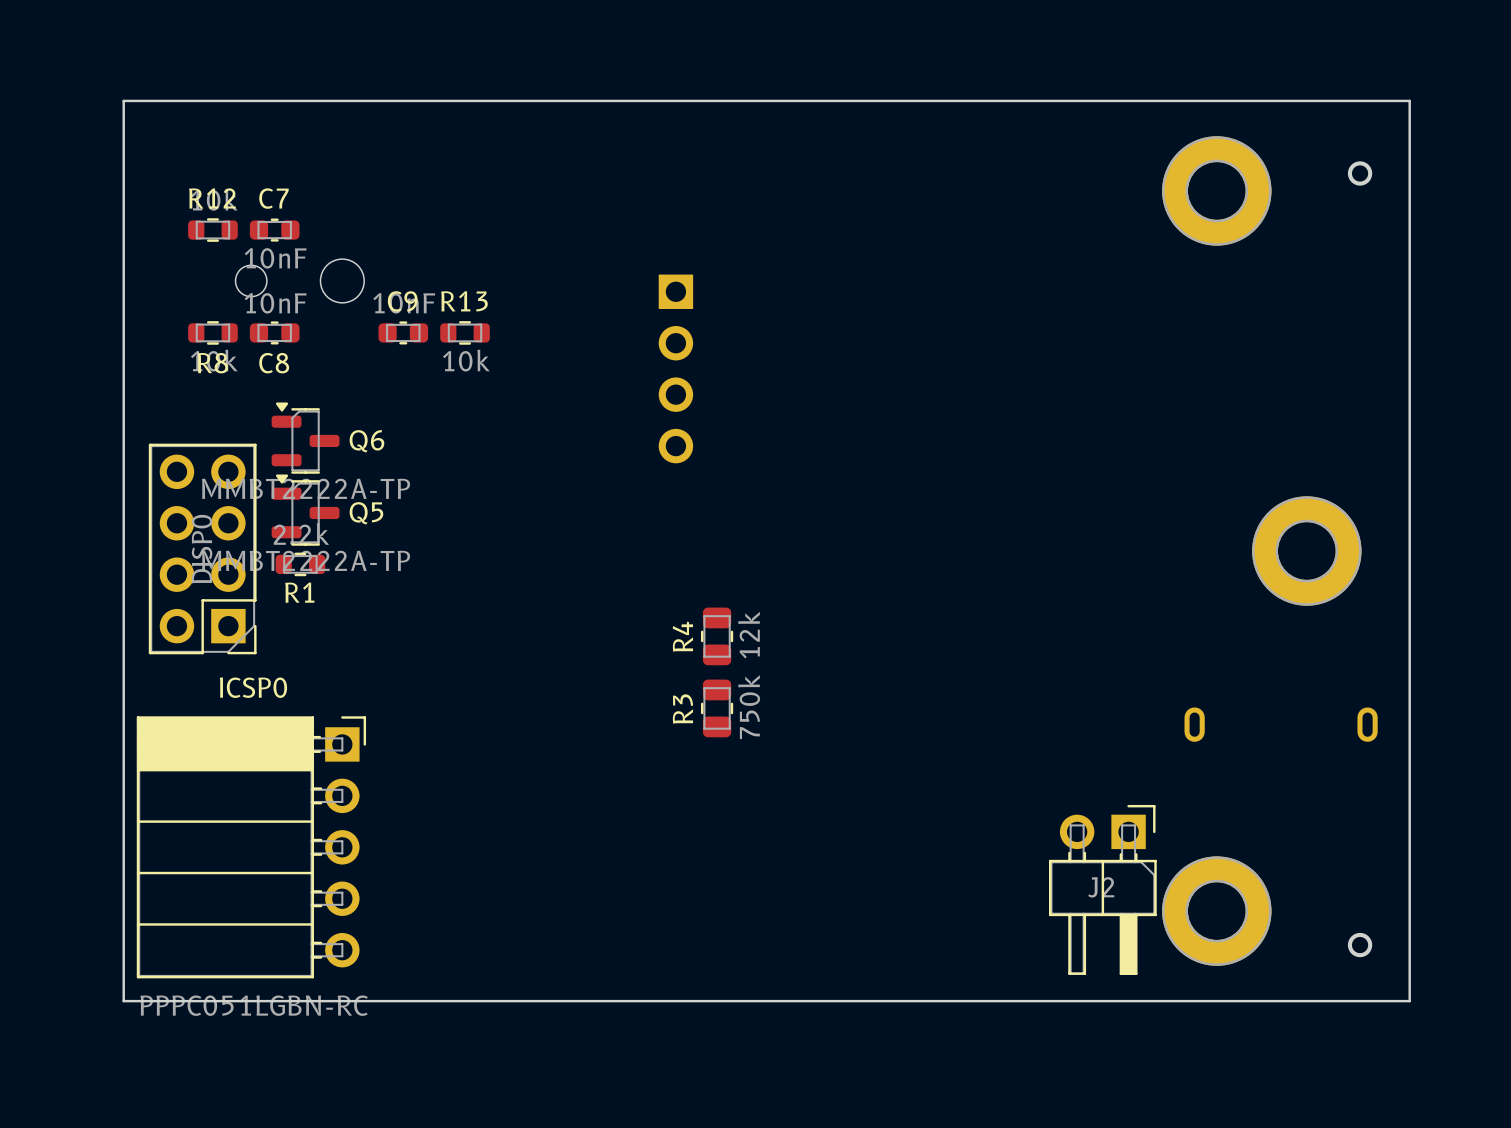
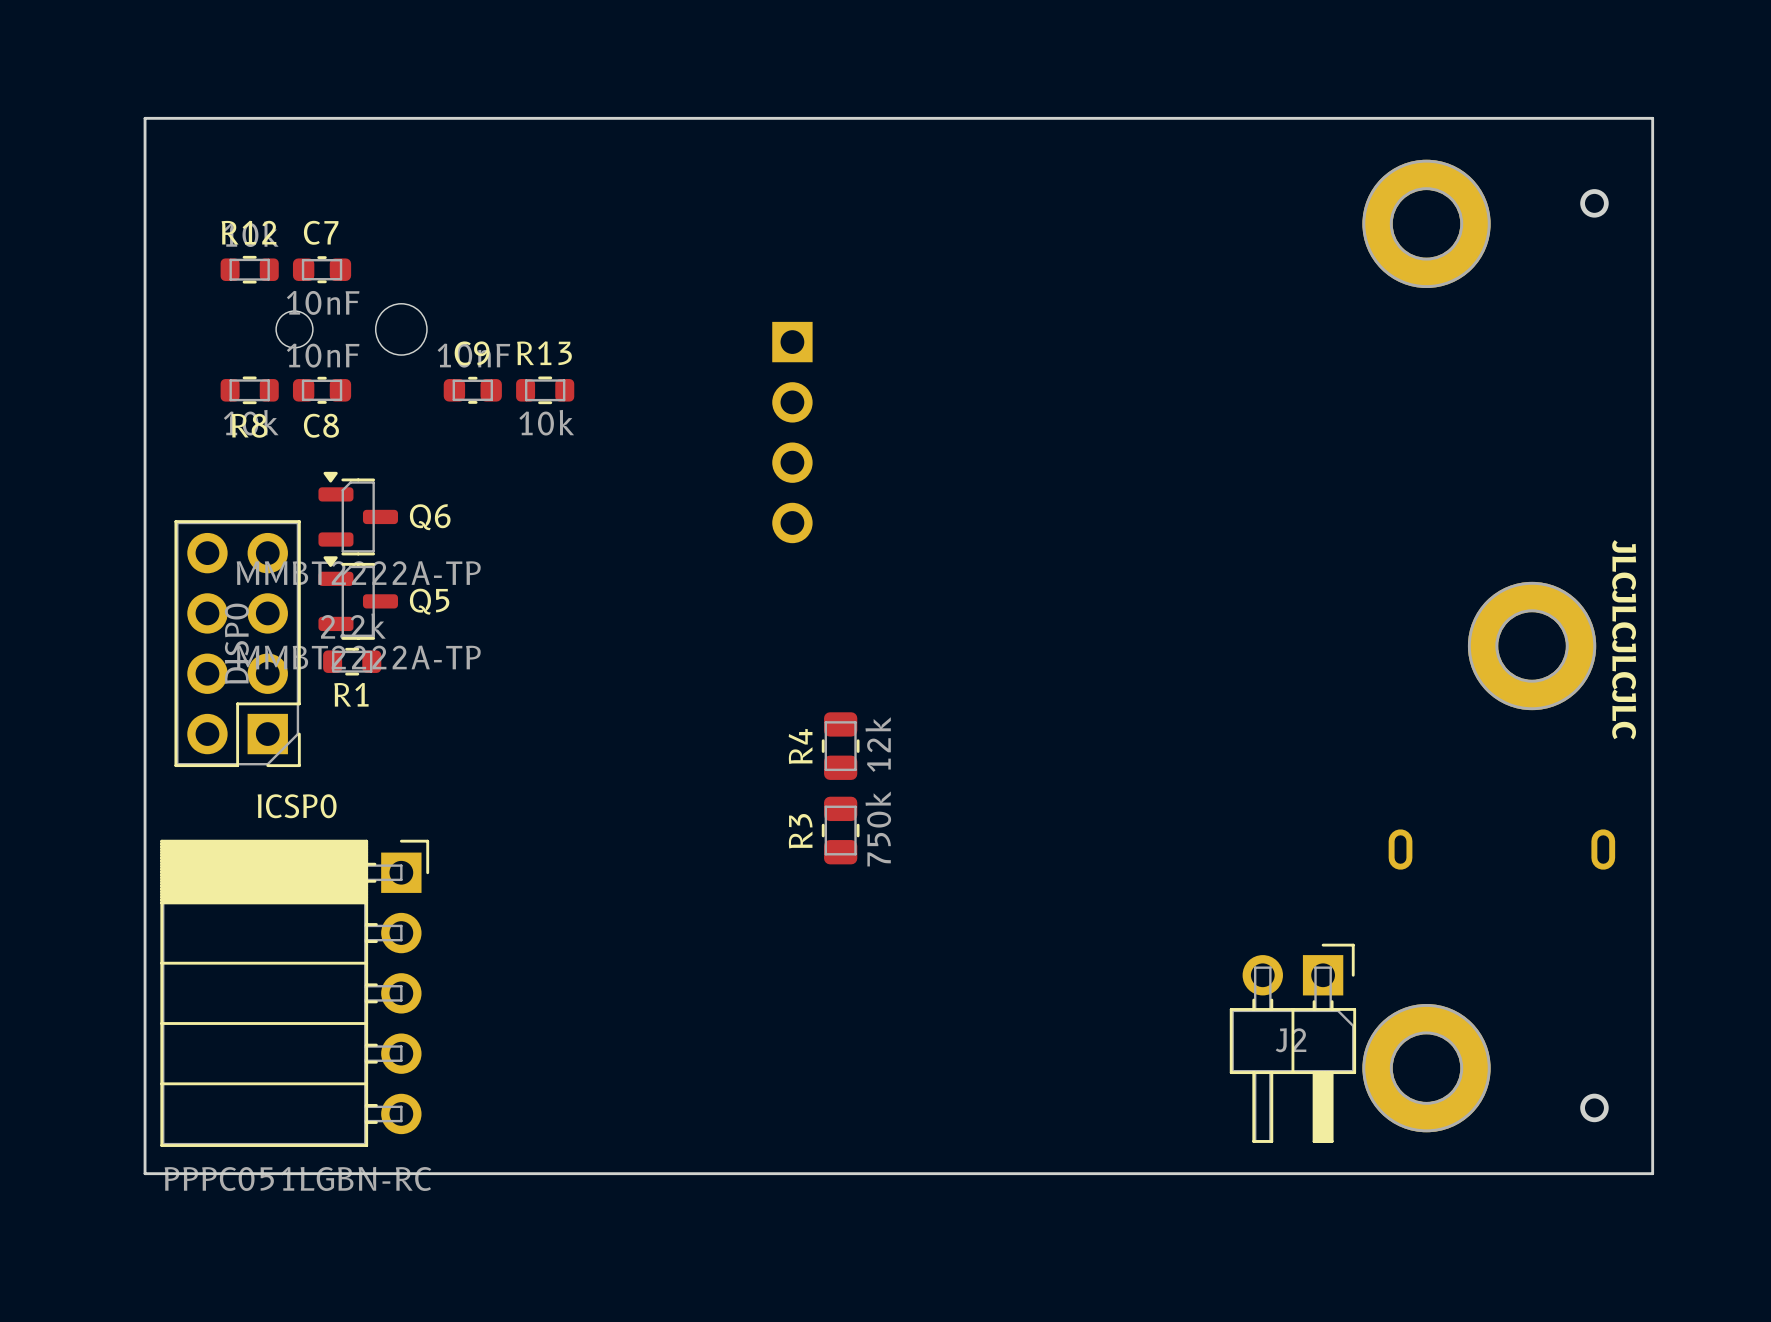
text: none -> JLCJLCJLCJLC (1624, 639)

